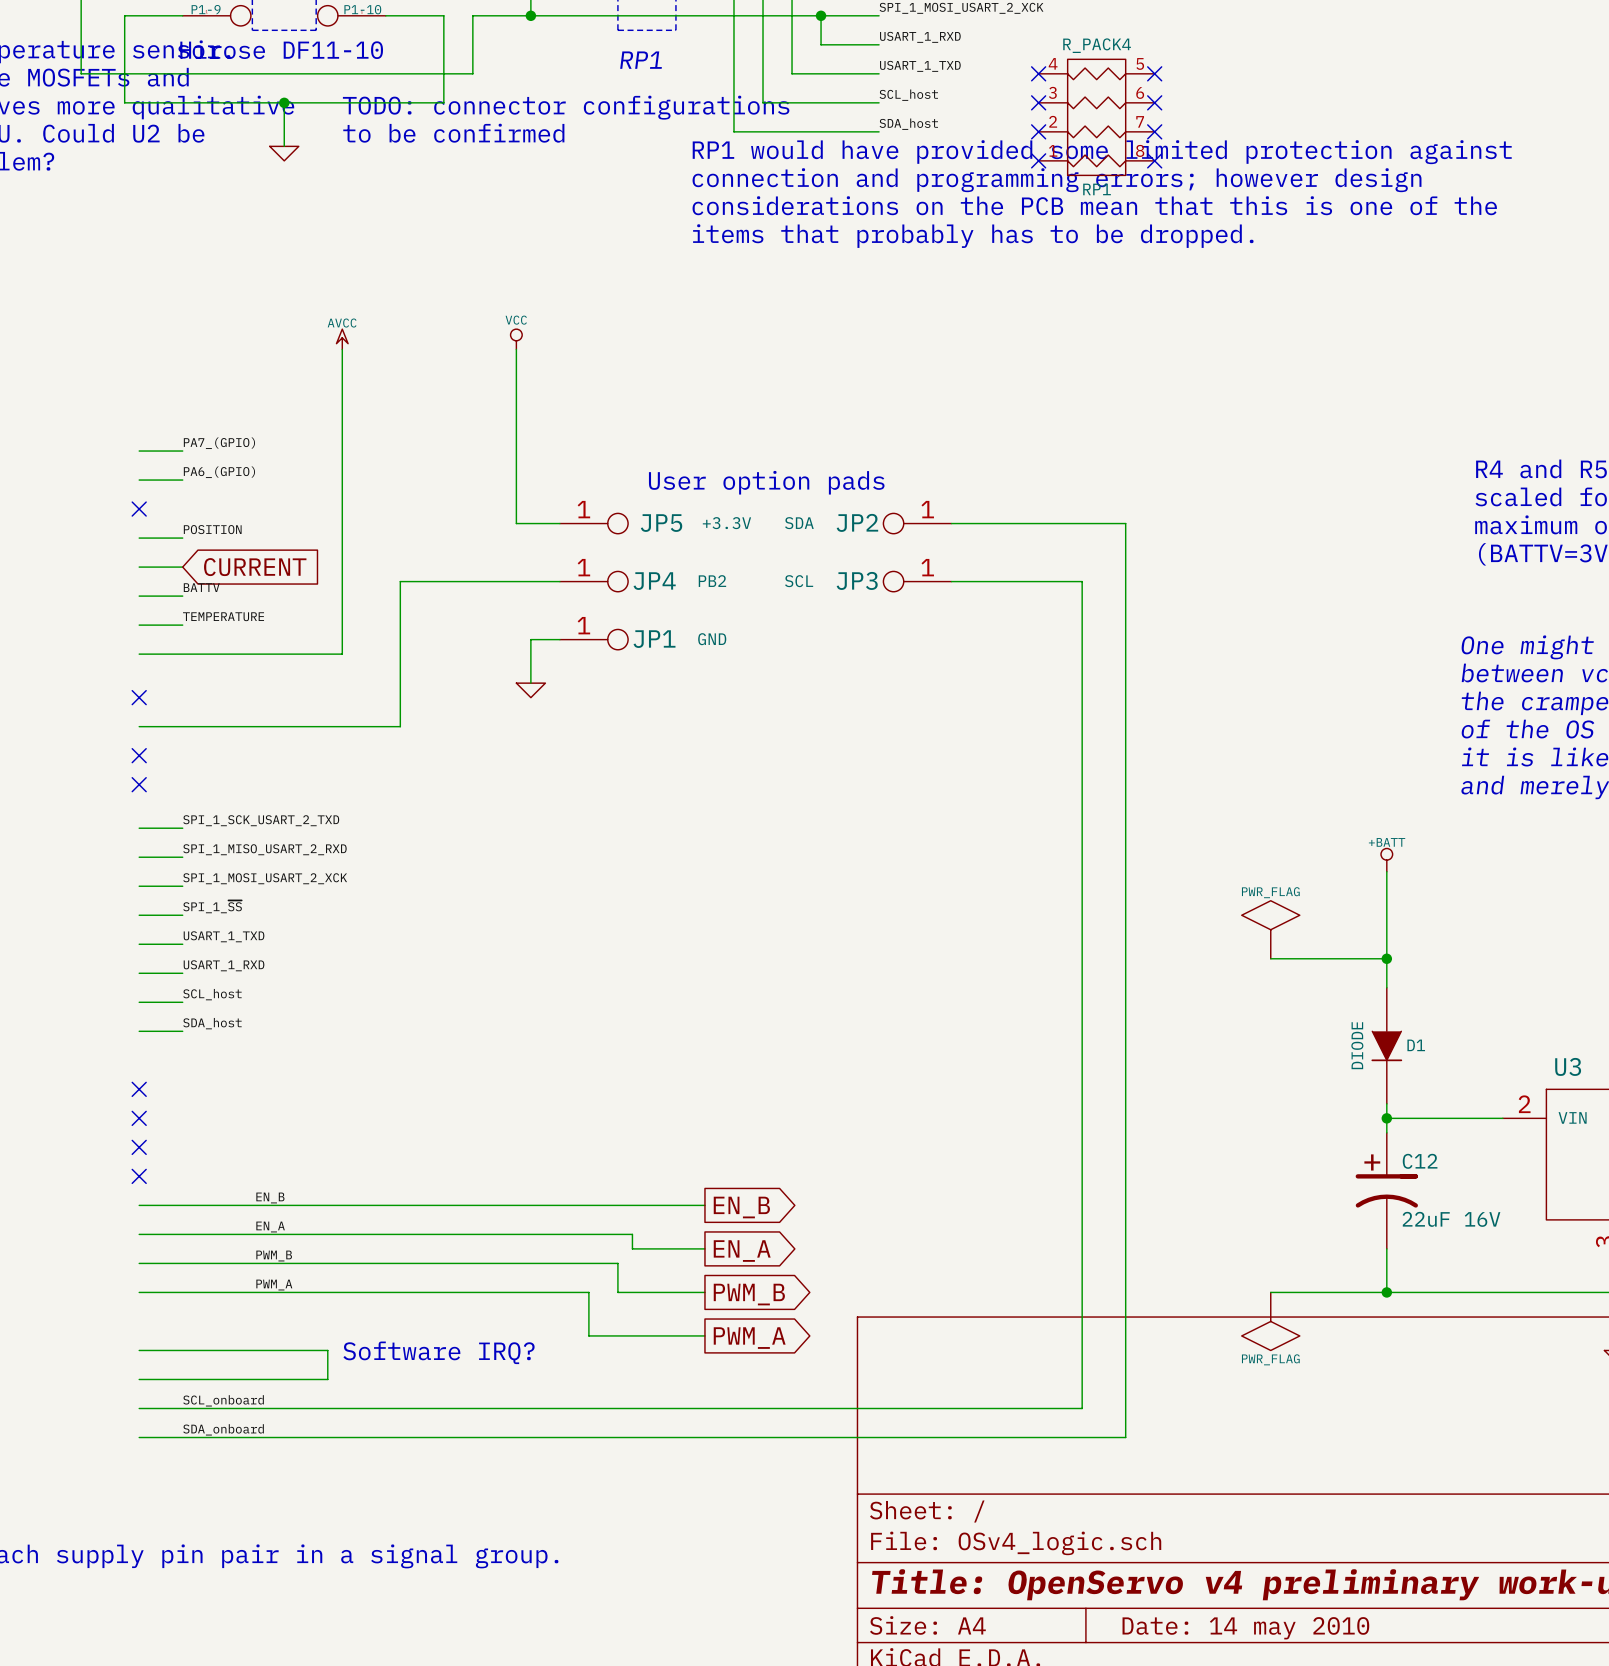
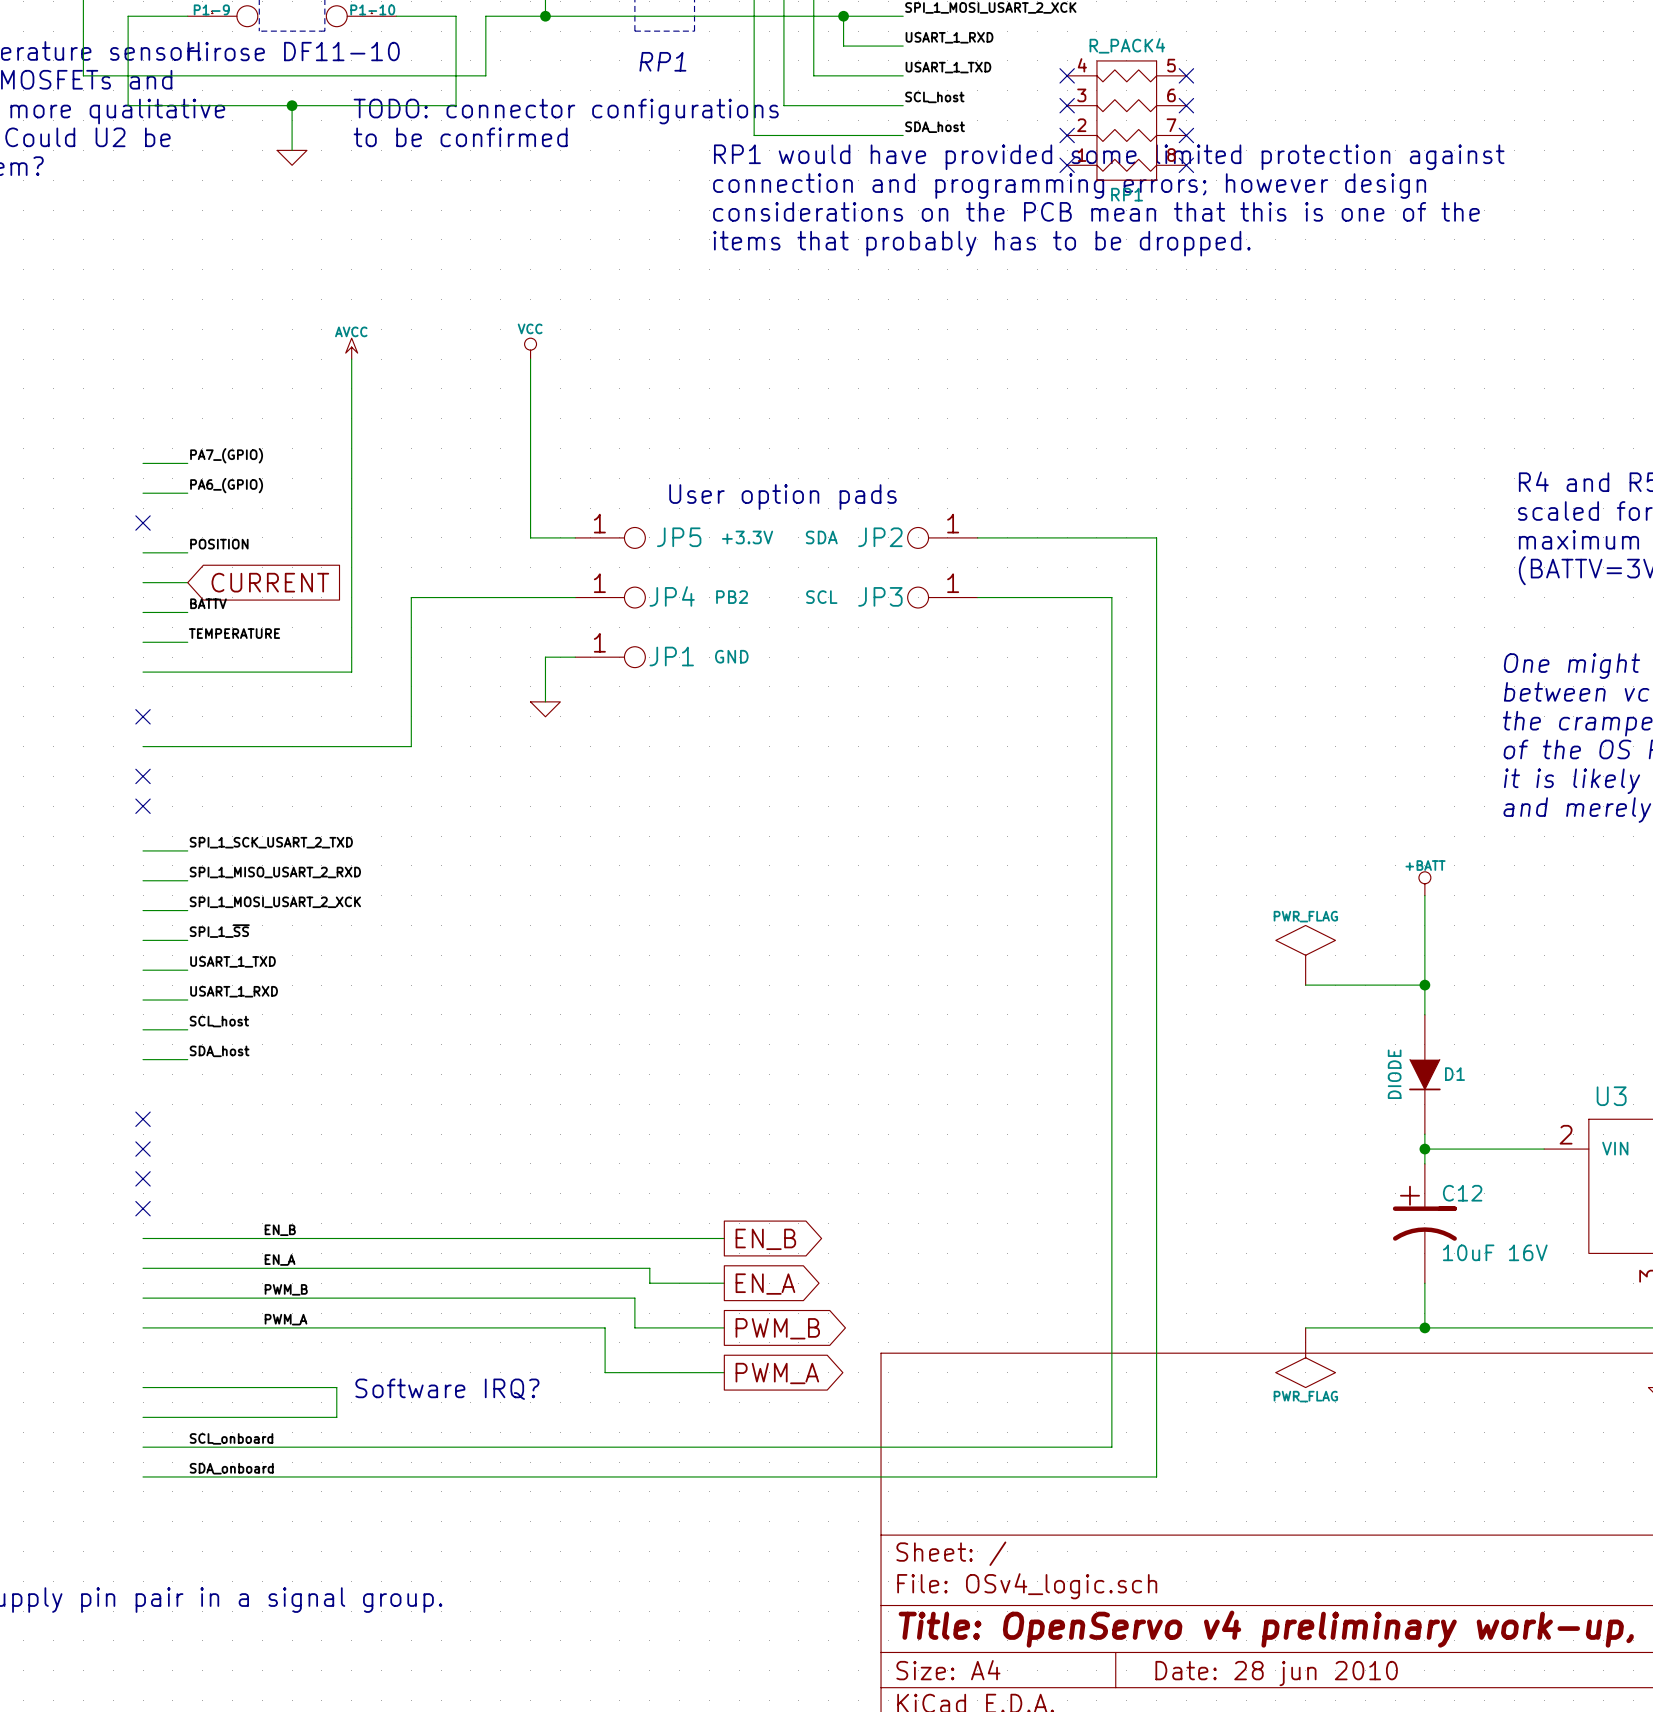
C12 value: 22uF 16V (1451, 1219) -> 10uF 16V (1495, 1252)
title block: Date: 14 may 2010 (1245, 1628) -> Date: 28 jun 2010 (1276, 1673)

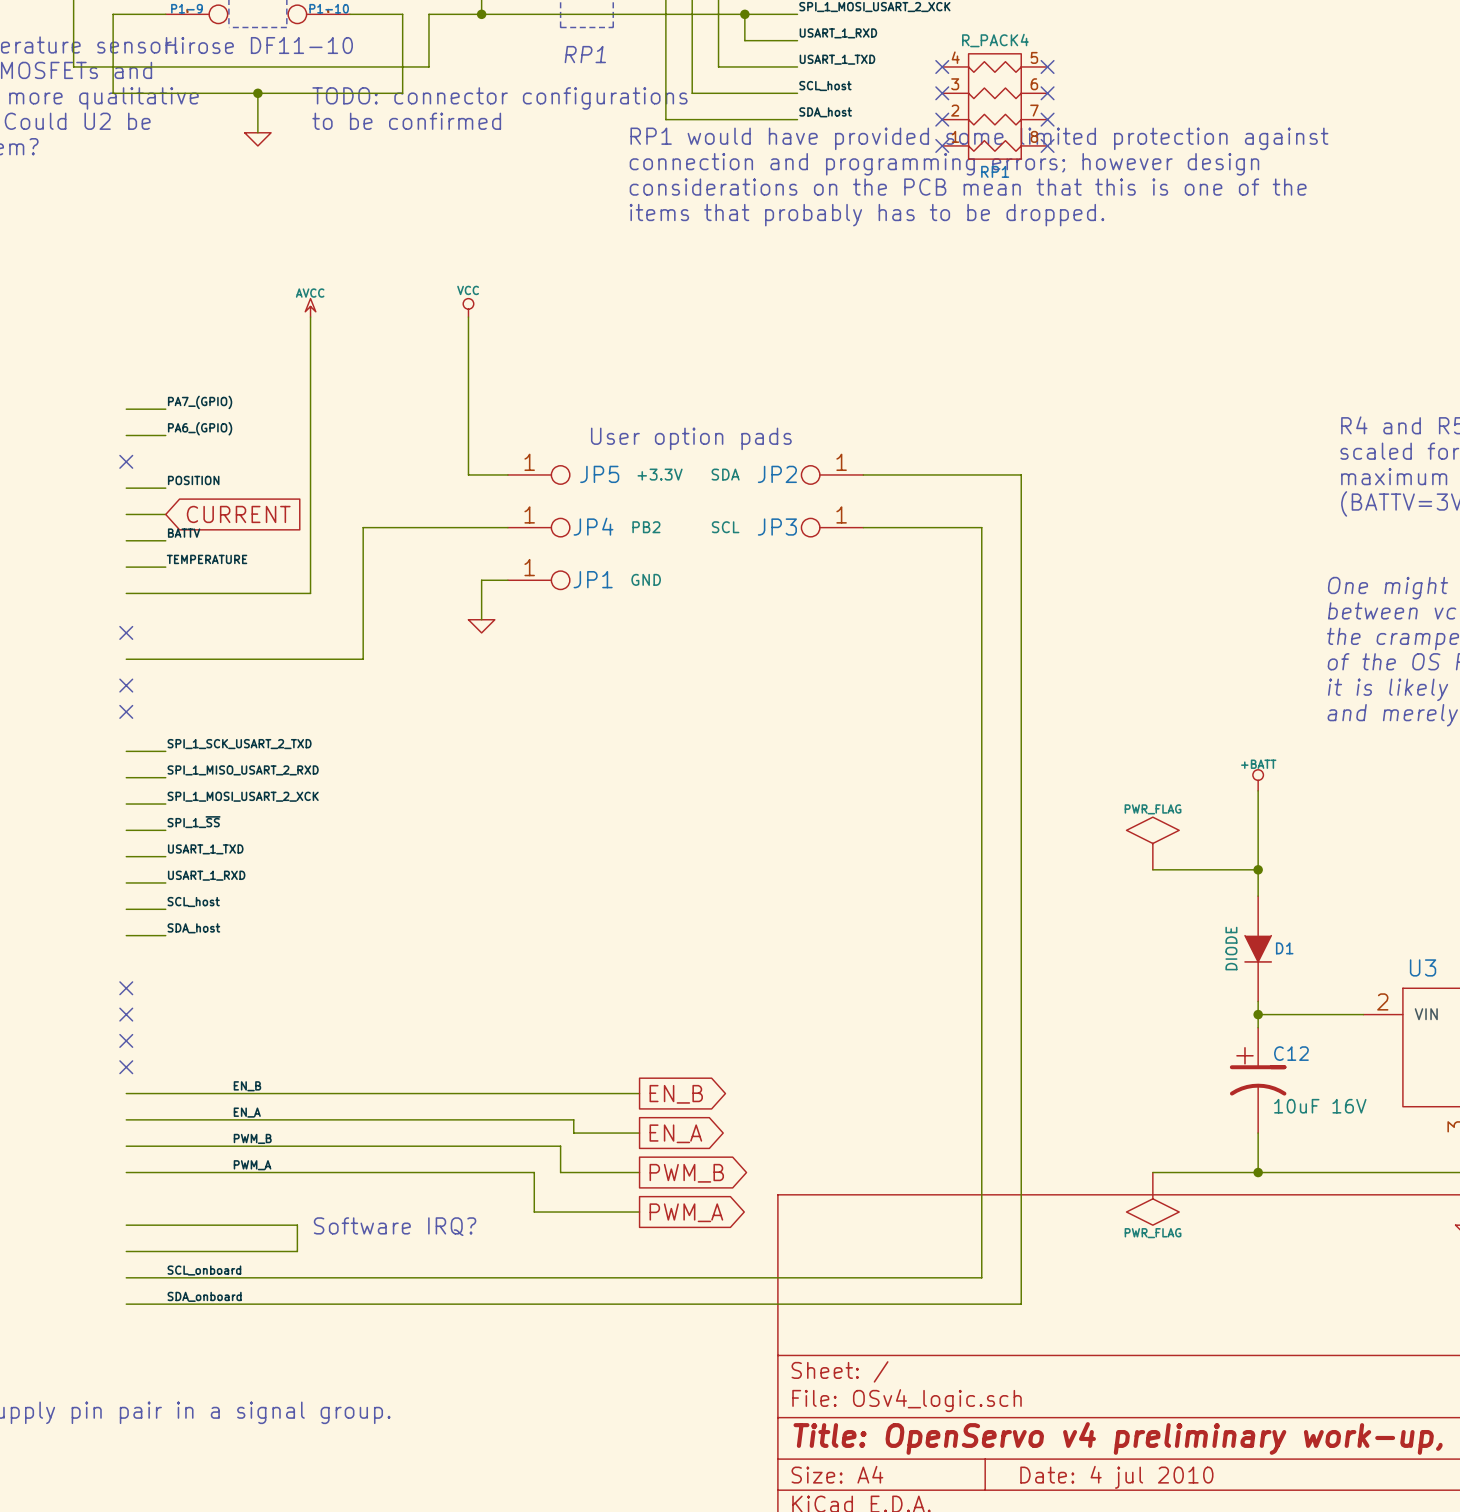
title block: Date: 28 jun 2010 (1276, 1673) -> Date: 4 jul 2010 (1116, 1477)

